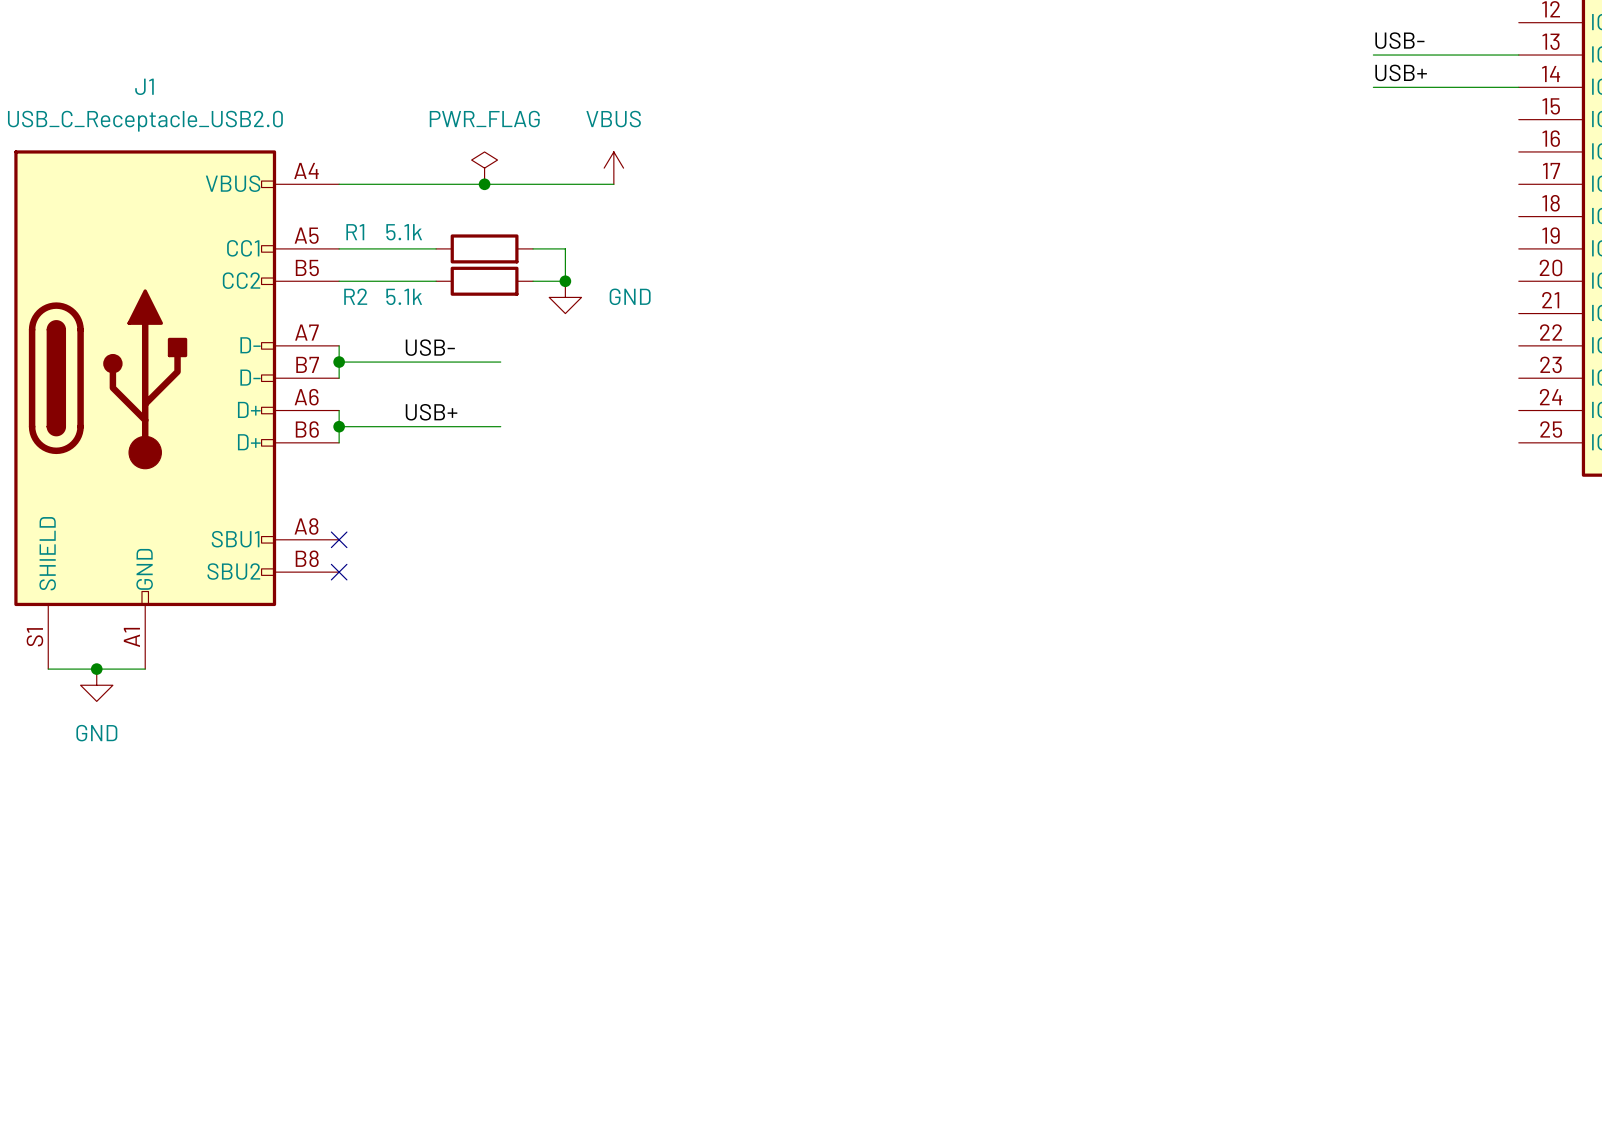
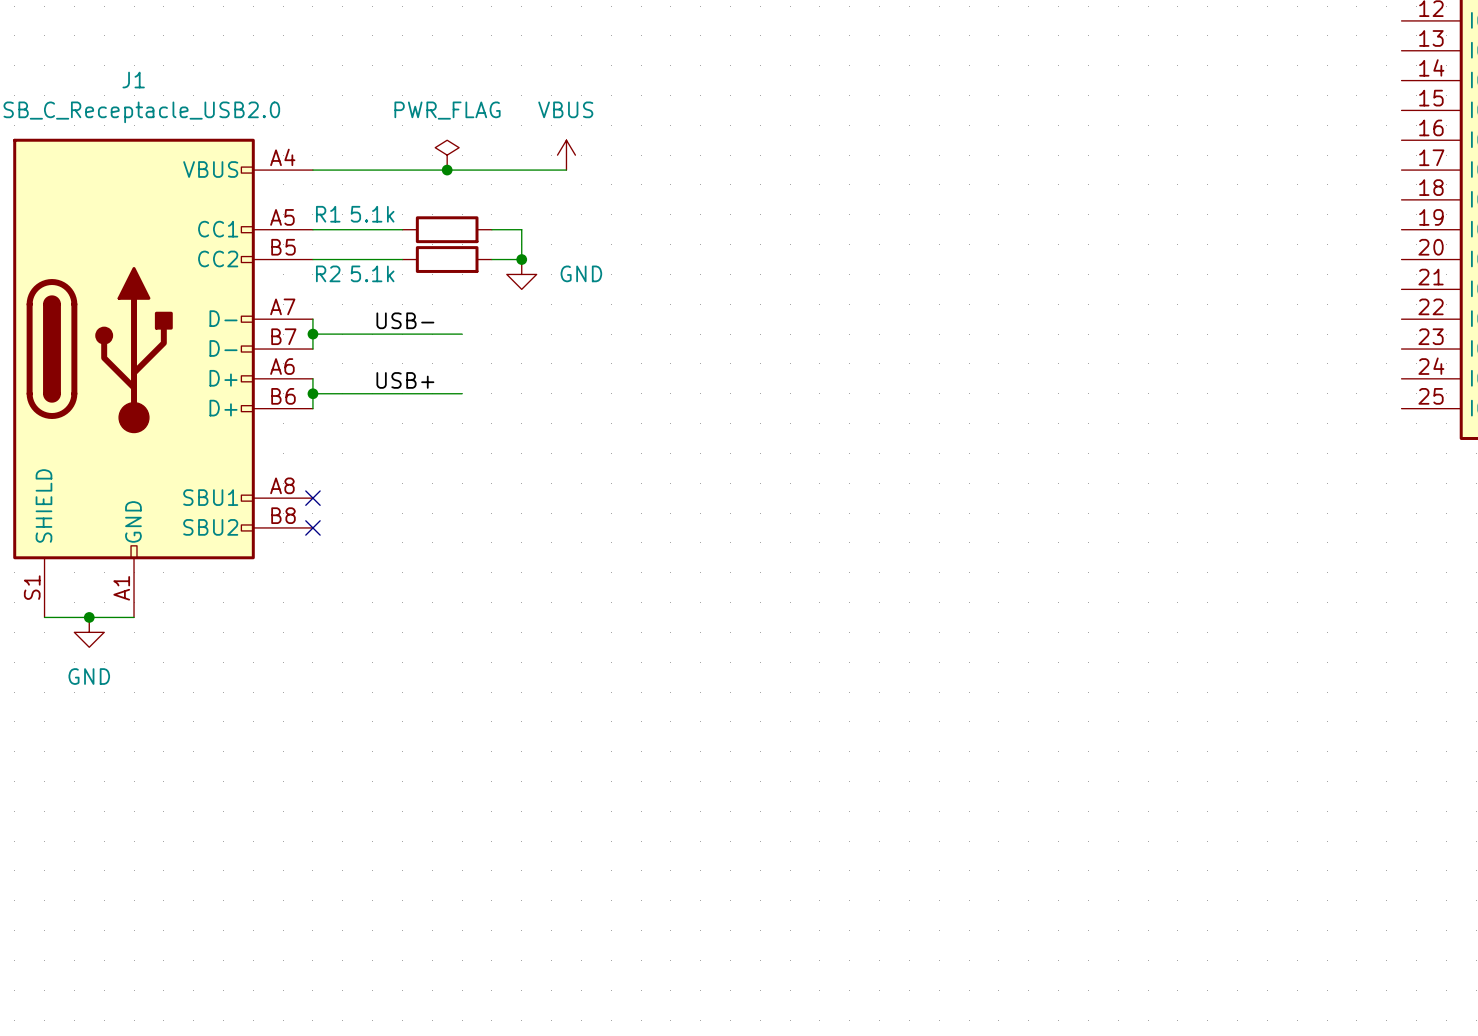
label: USB- (1399, 40) -> none
wire: (1373, 55) (1518, 55) -> none
label: USB+ (1401, 72) -> none
wire: (1373, 87) (1518, 87) -> none

